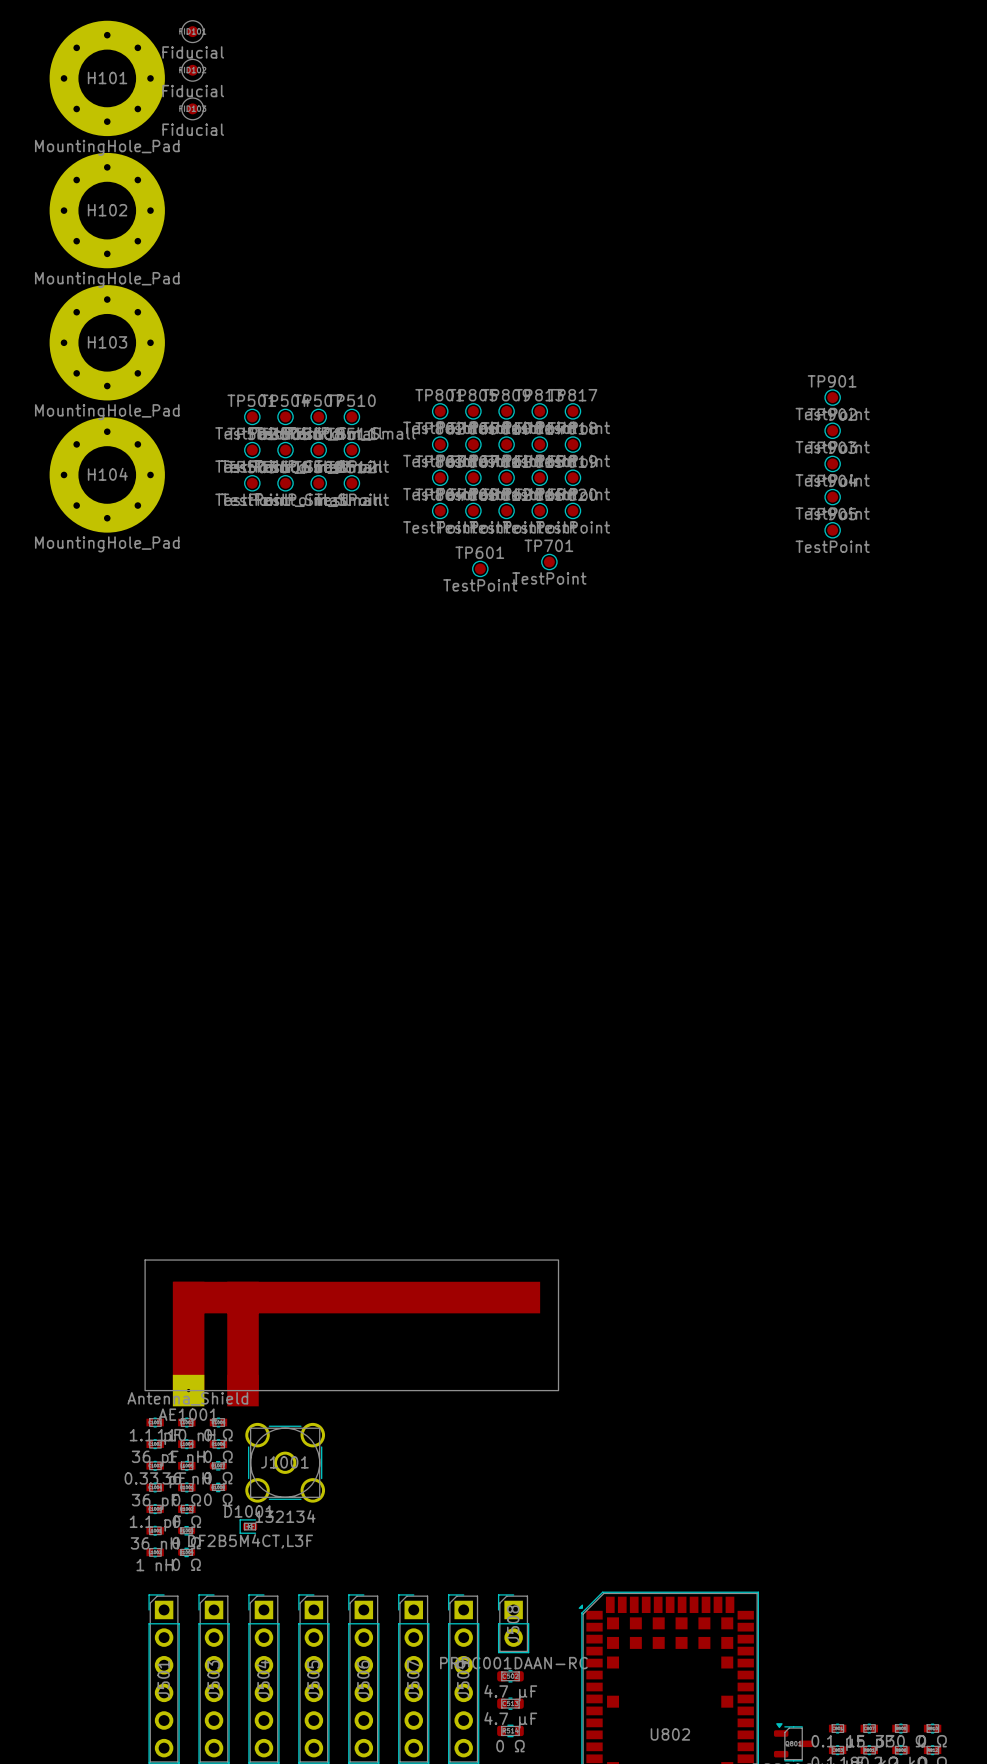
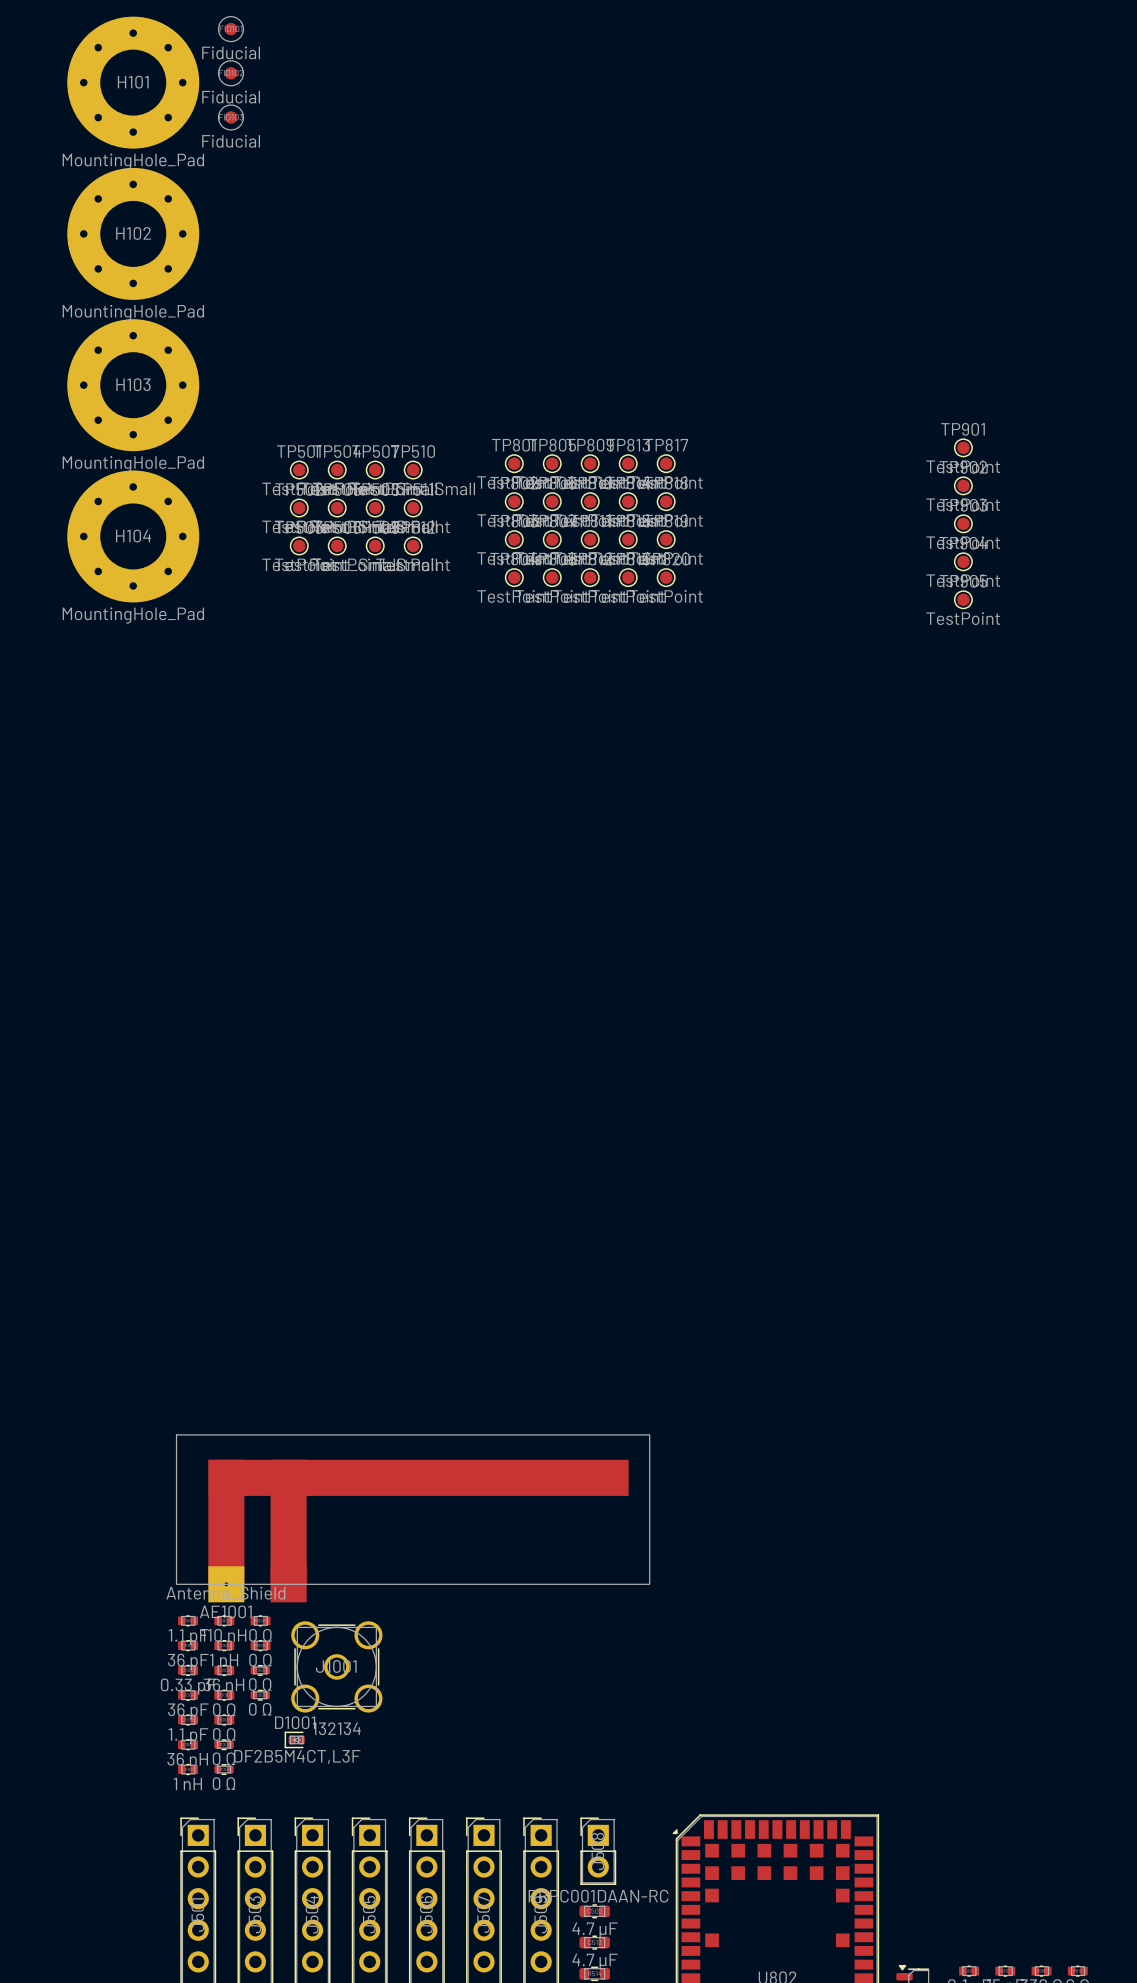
TP701: TestPoint (549, 562) -> none
TP601: TestPoint (480, 568) -> none

